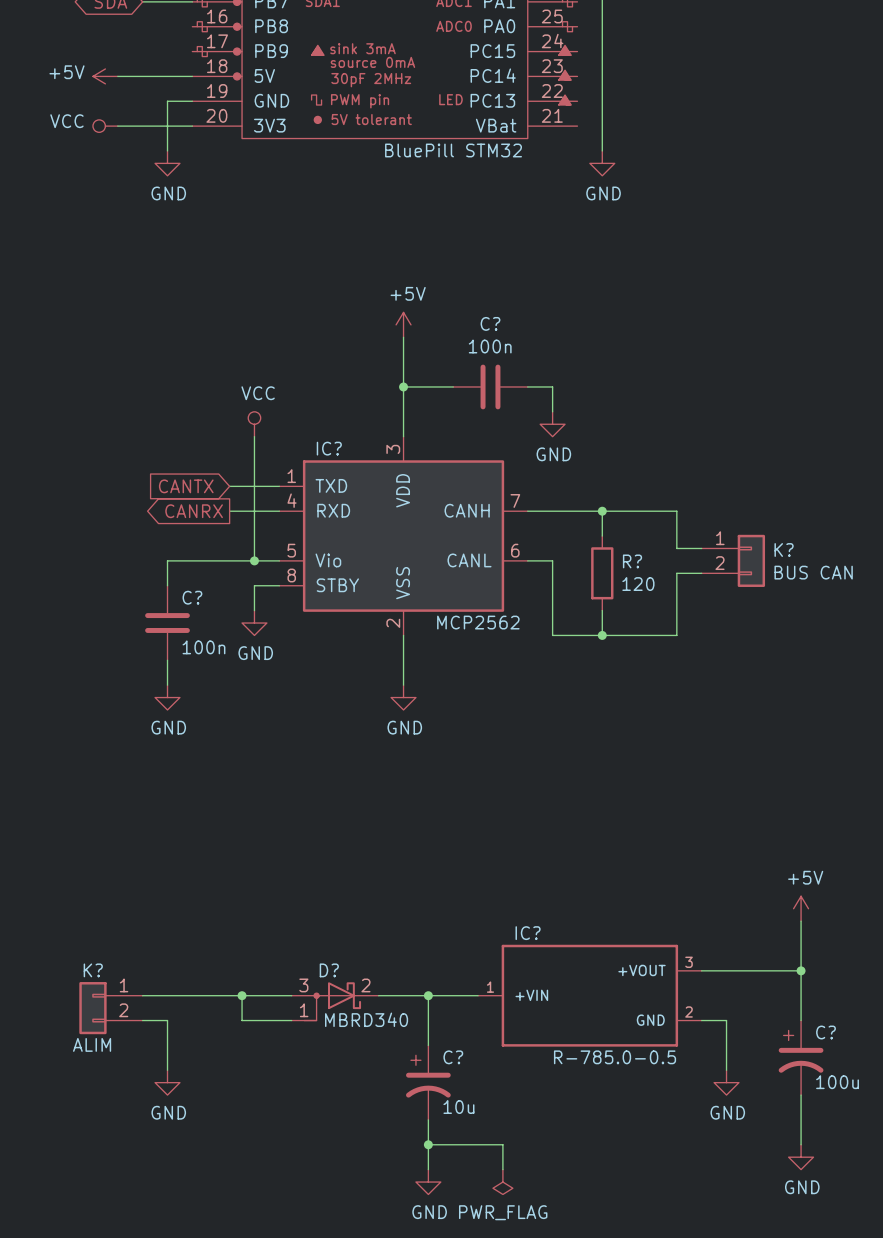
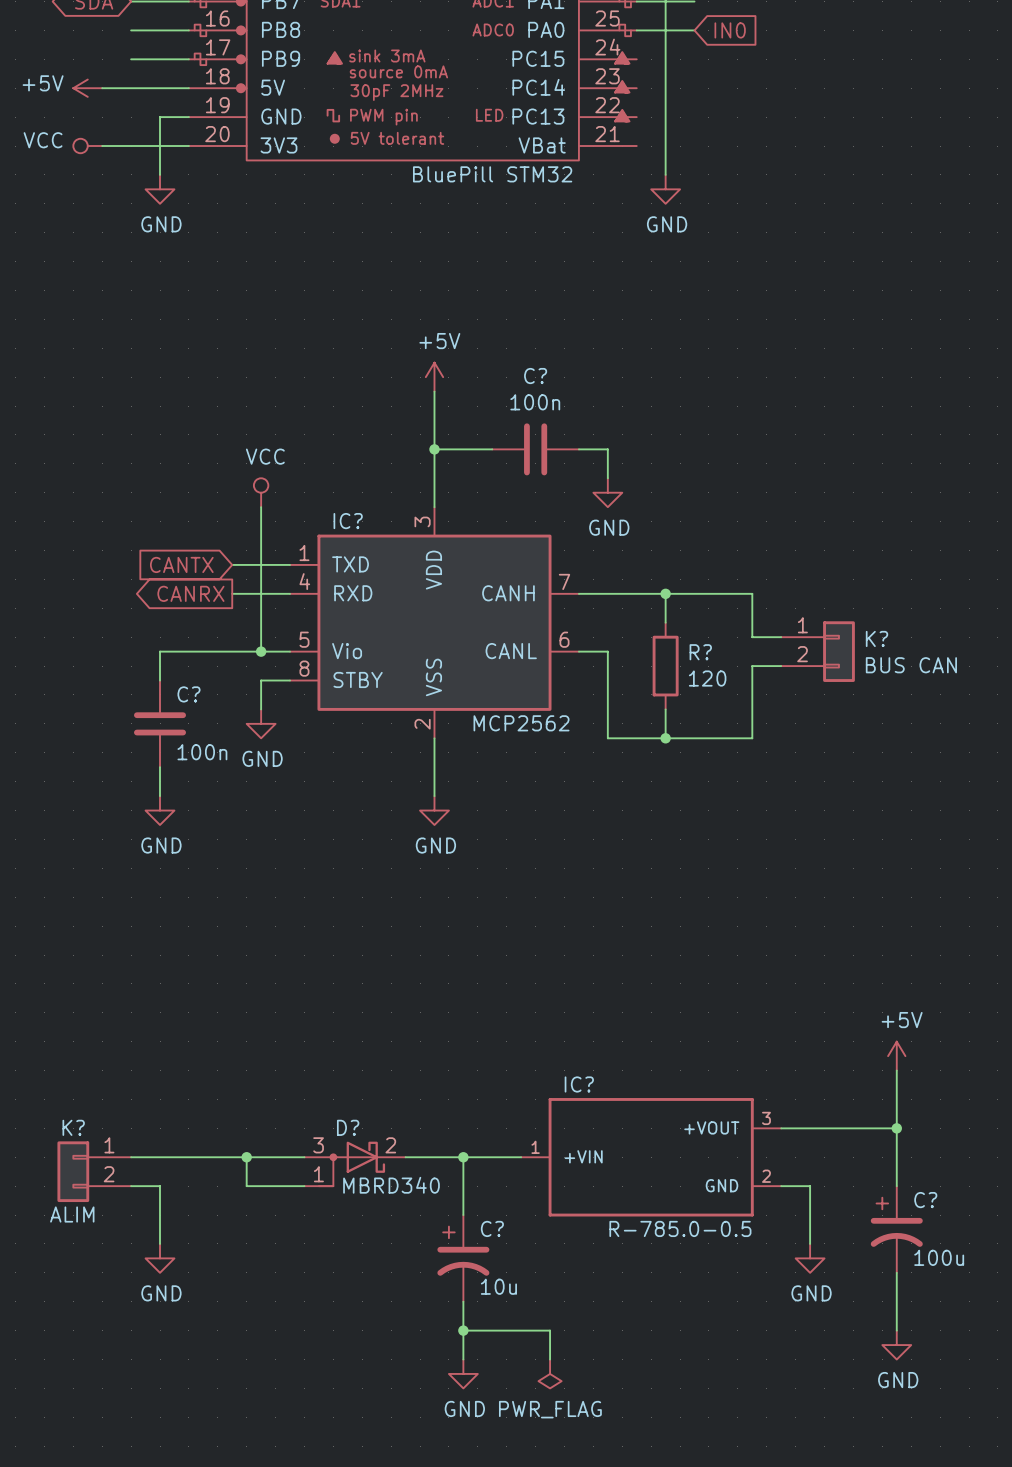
wire: none -> (636, 1) (694, 1)
wire: none -> (131, 30) (188, 30)
wire: none -> (636, 30) (694, 30)
global label: none -> IN0 (730, 30)
wire: none -> (131, 59) (188, 59)

